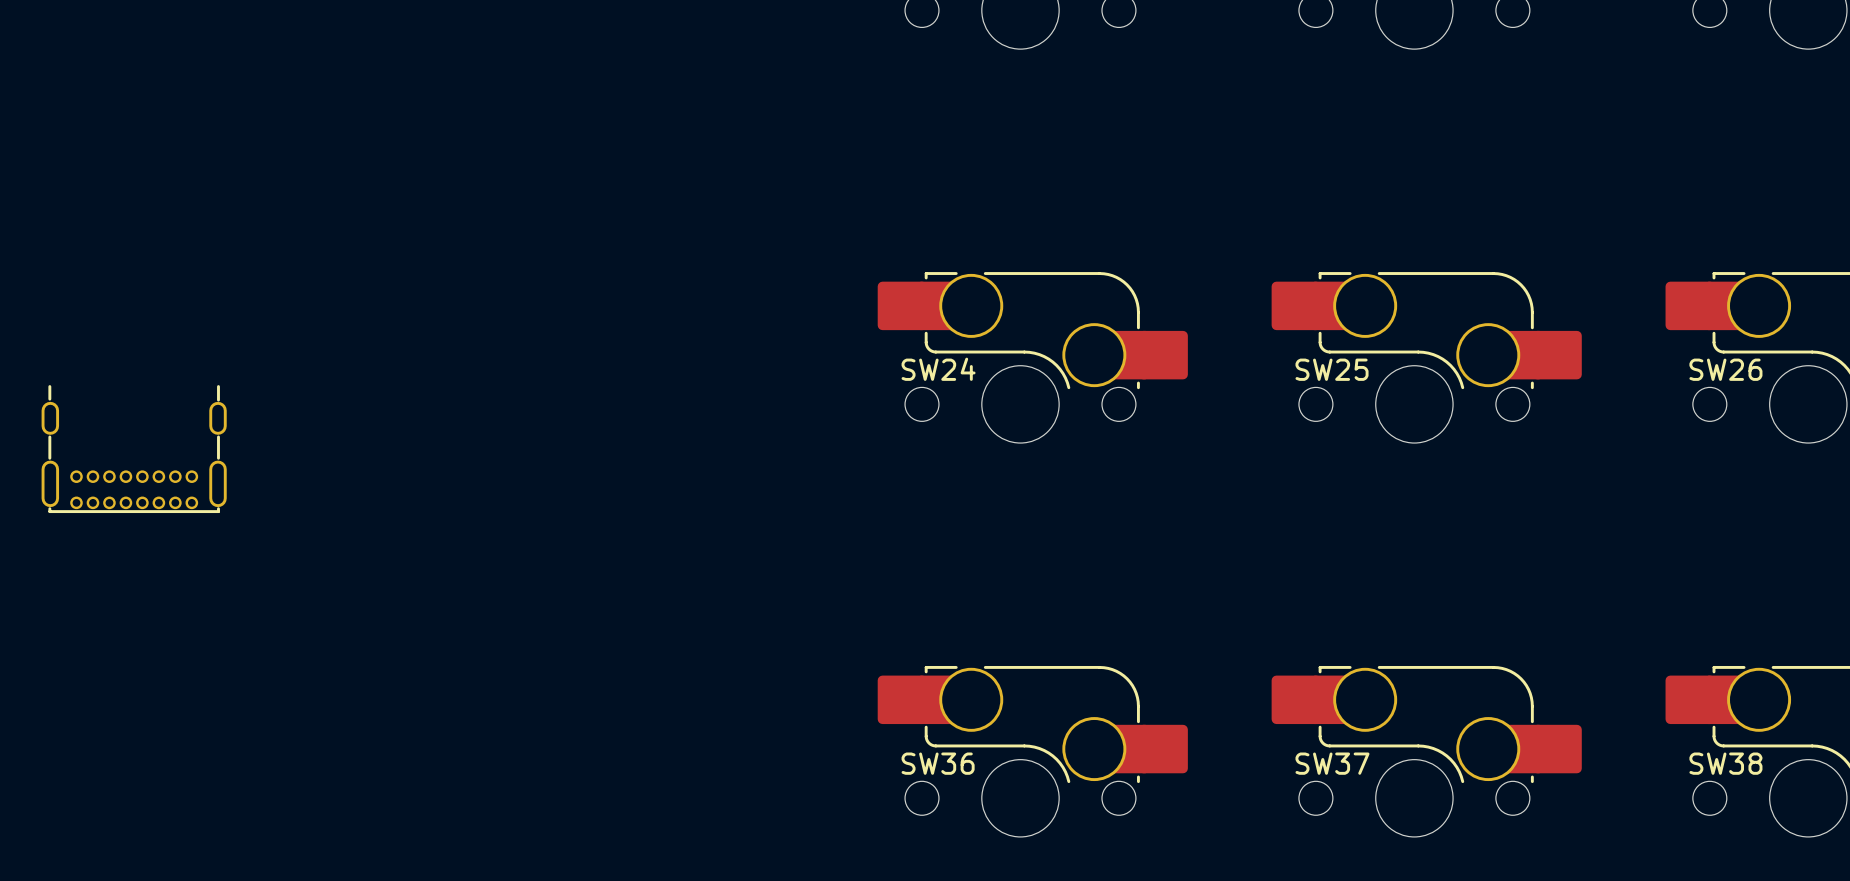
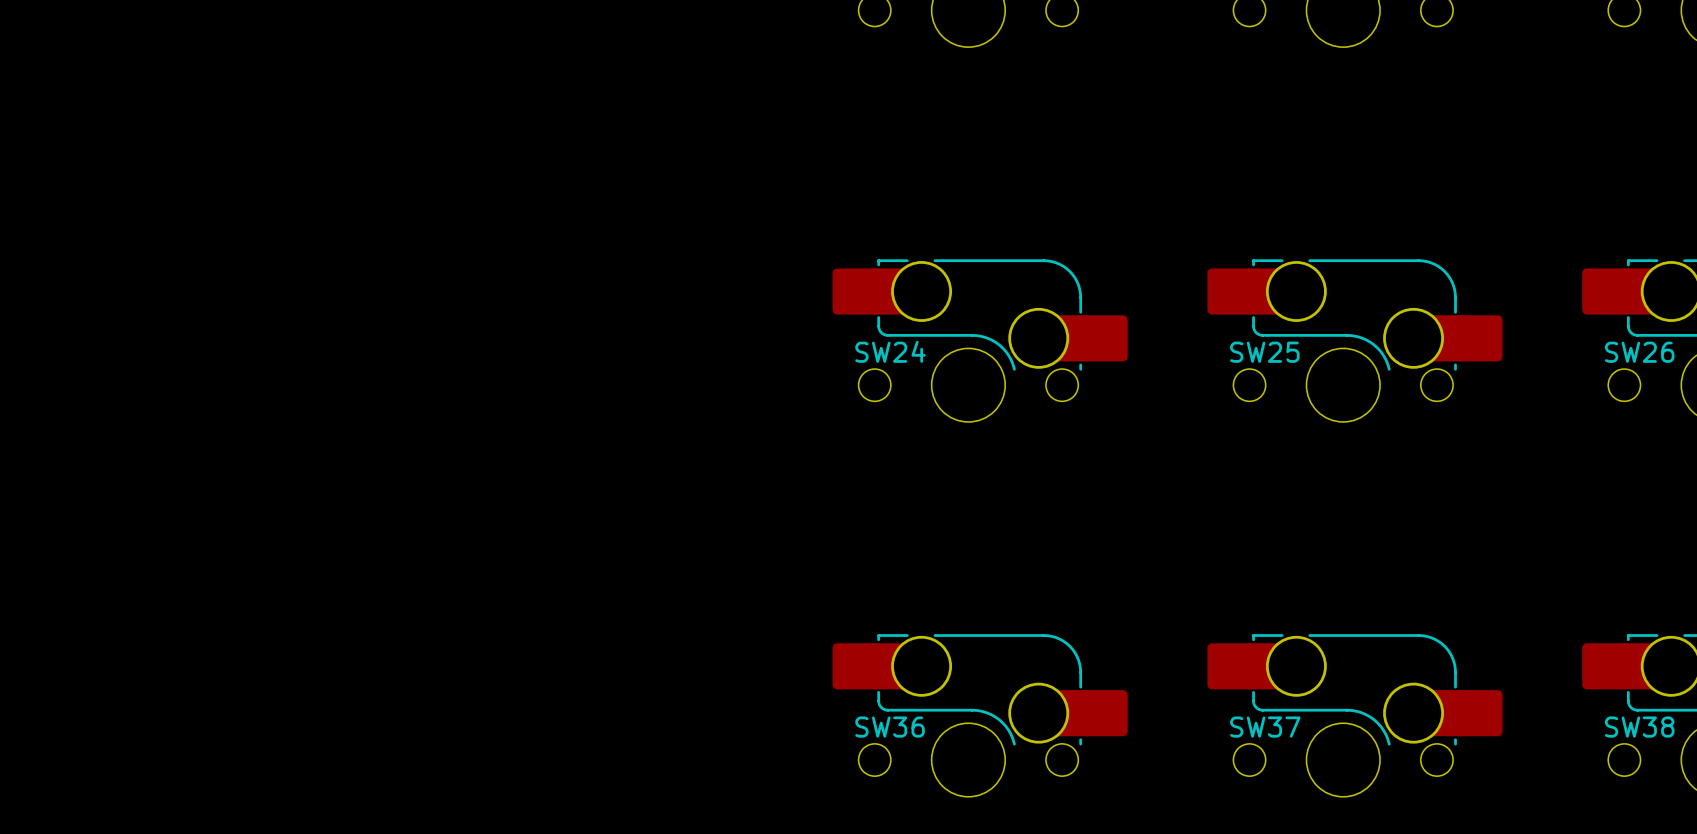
part: (134, 449) -> none

